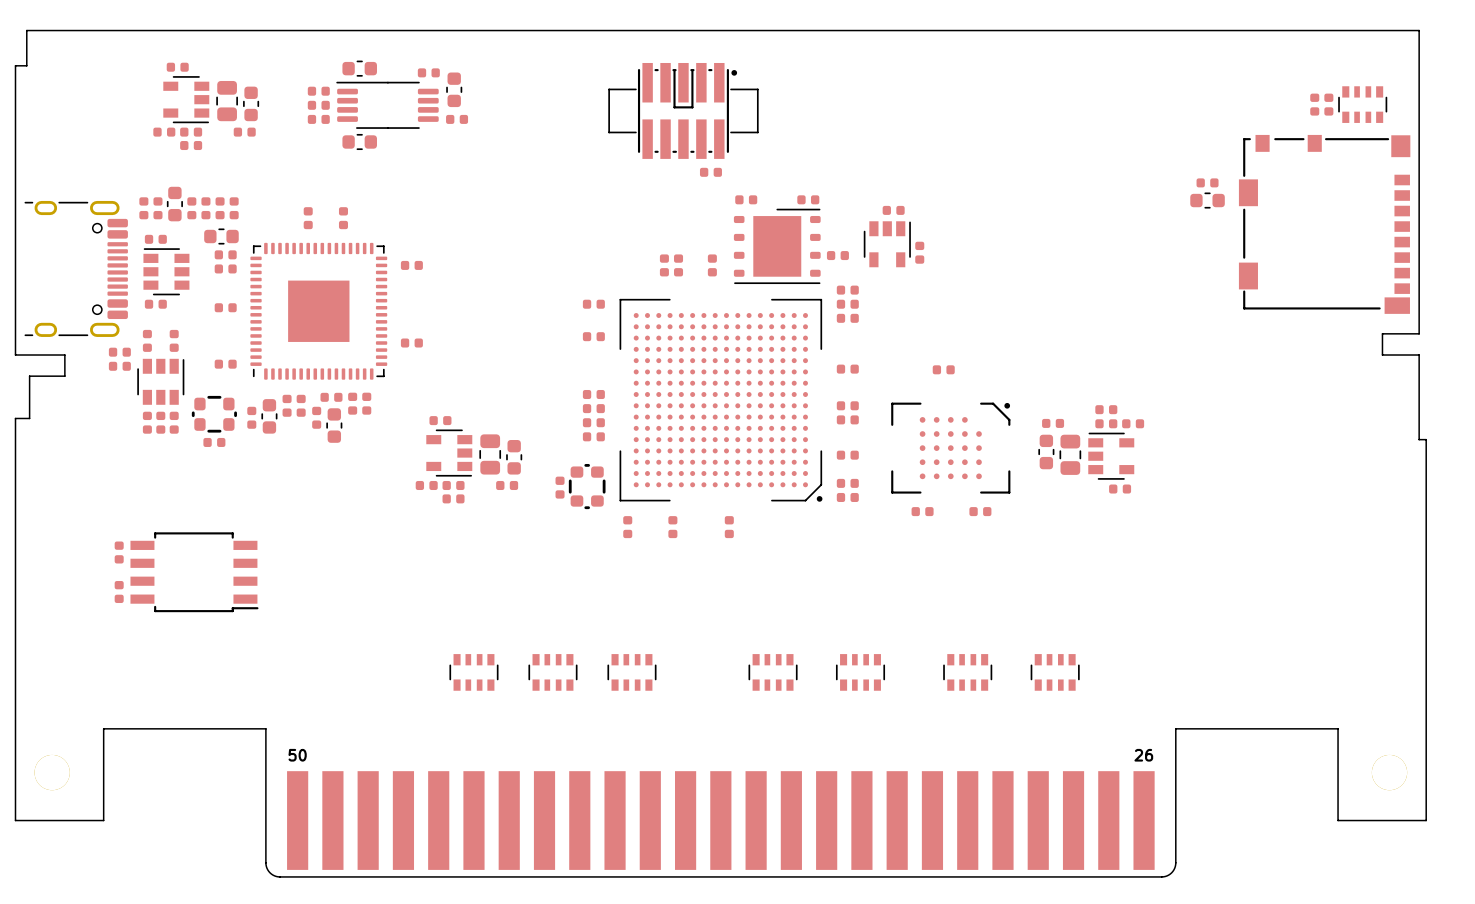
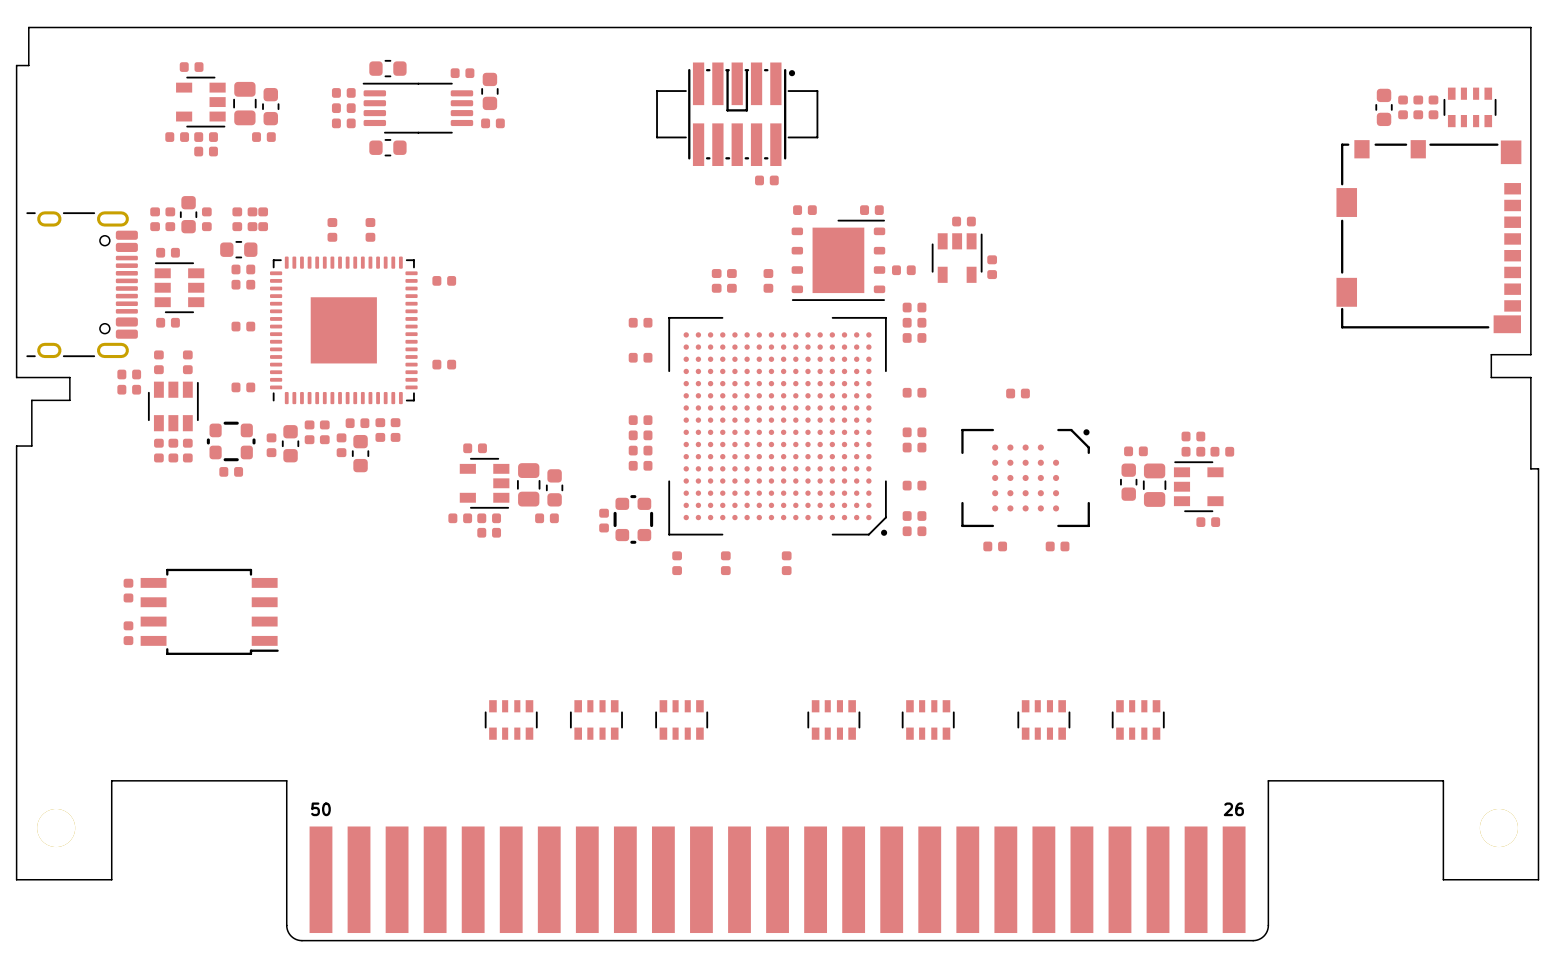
part rotation: 0° (1207, 182) -> 90° clockwise (1403, 107)
part position: (1207, 182) -> (1403, 107)
part rotation: 0° (1207, 200) -> 90° clockwise (1384, 107)
part position: (1207, 200) -> (1384, 107)
part position: (205, 208) -> (263, 219)

